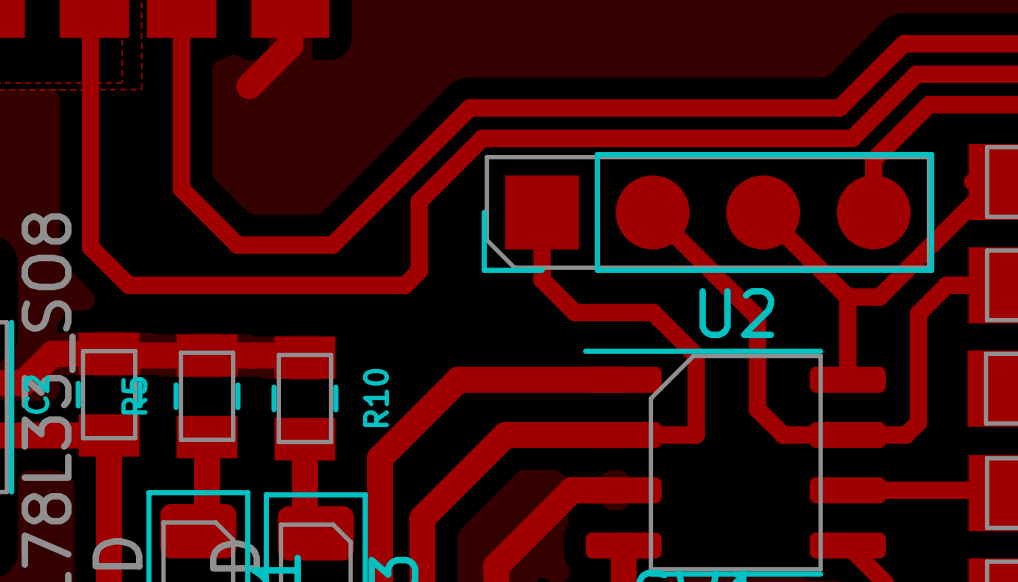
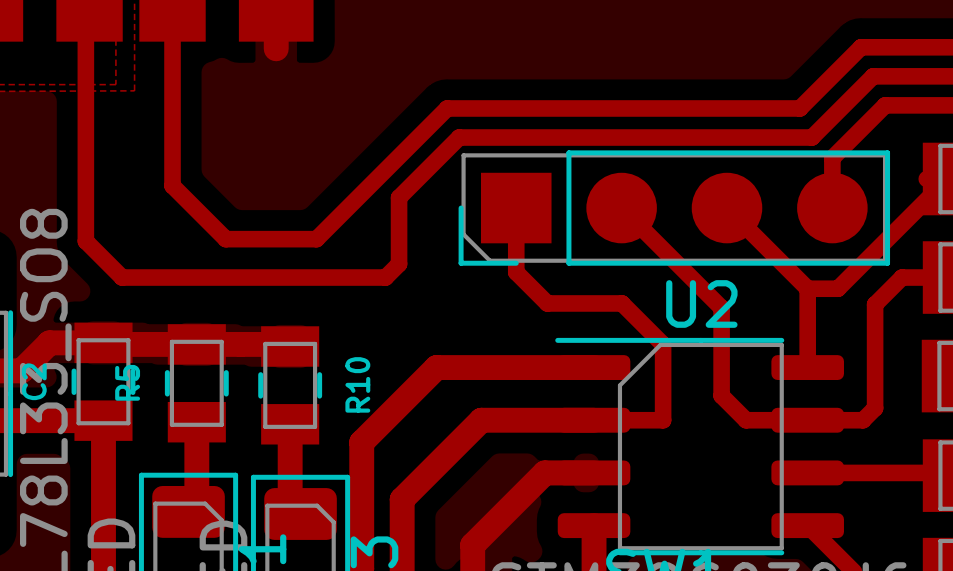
track: (290, 45) (249, 86) -> none

